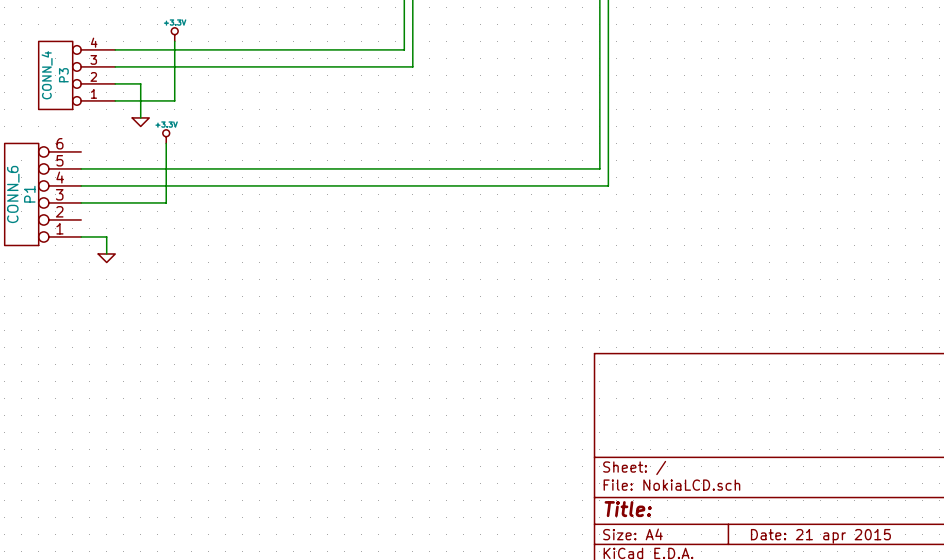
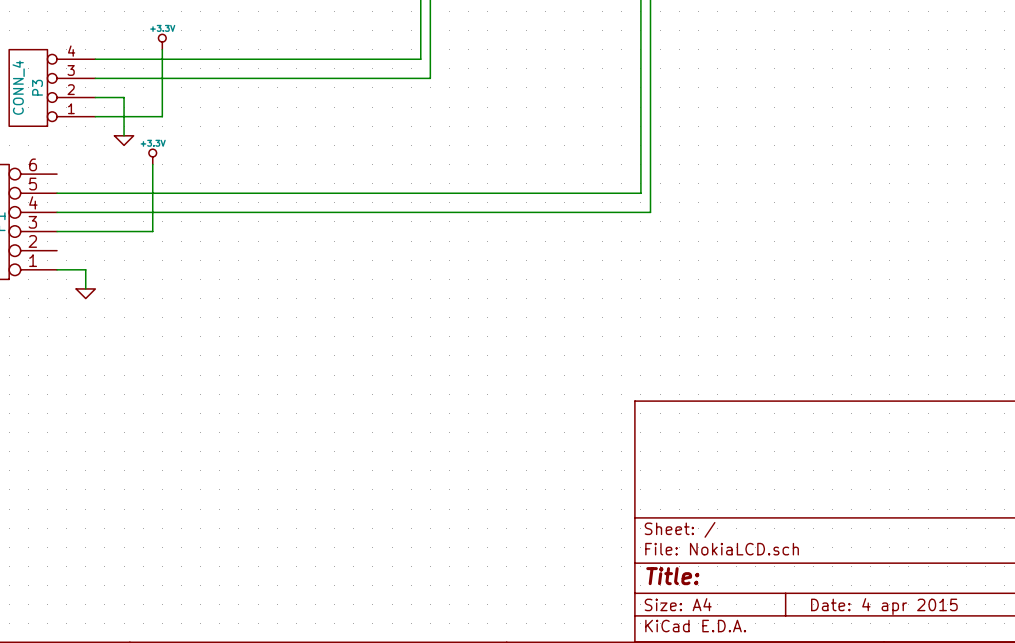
title block: Date: 21 apr 2015 (820, 536) -> Date: 4 apr 2015 (884, 606)

